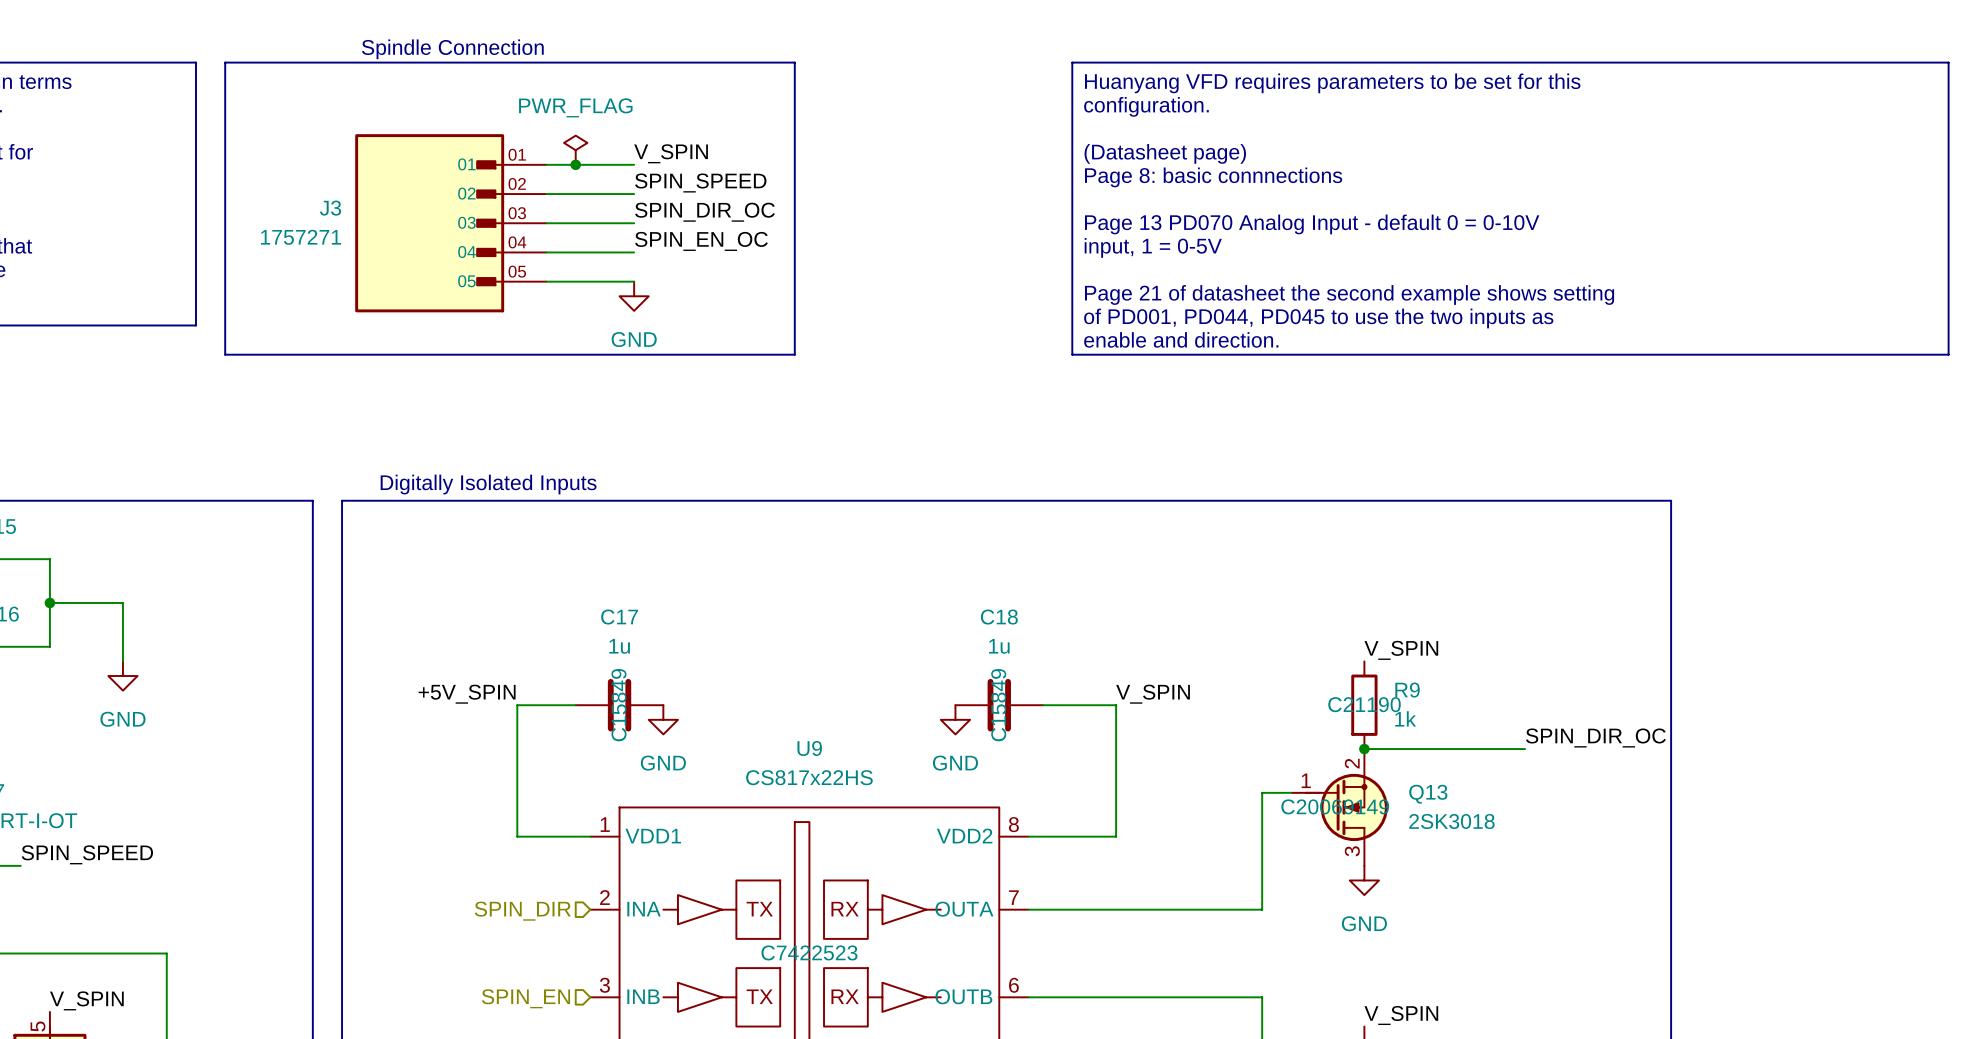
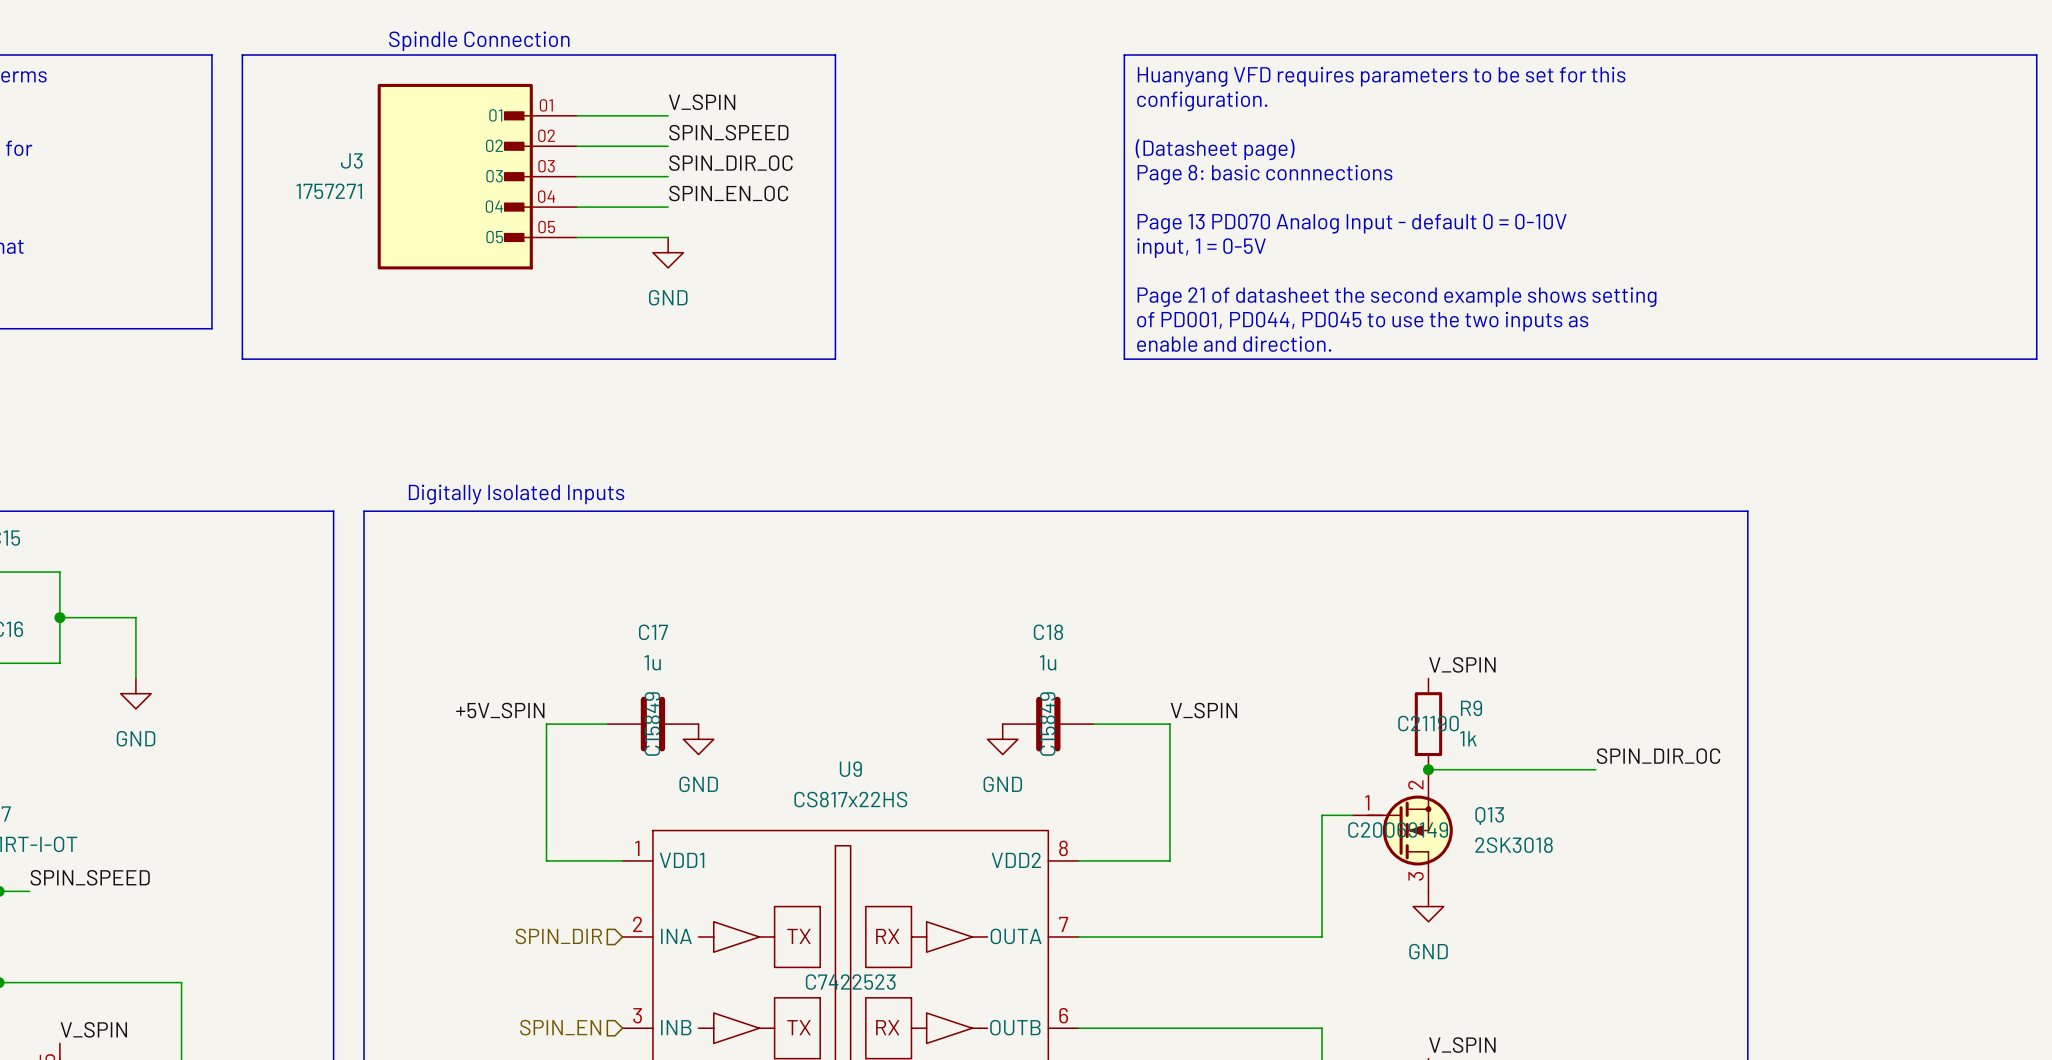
power symbol: PWR_FLAG (575, 150) -> none
label position: V_SPIN (671, 153) -> V_SPIN (702, 102)
wire: (546, 164) (634, 164) -> (576, 115) (668, 115)
junction: (575, 164) -> none
label position: SPIN_SPEED (700, 183) -> SPIN_SPEED (728, 132)
wire: (546, 194) (634, 194) -> (576, 146) (668, 146)
label position: SPIN_DIR_OC (705, 212) -> SPIN_DIR_OC (730, 163)
J3 position: (450, 223) -> (477, 176)
wire: (546, 223) (634, 223) -> (576, 176) (668, 176)
label position: SPIN_EN_OC (701, 241) -> SPIN_EN_OC (728, 193)
wire: (546, 252) (634, 252) -> (576, 207) (668, 207)
wire: (546, 281) (634, 281) -> (576, 237) (668, 237)
power symbol position: GND (634, 296) -> GND (668, 252)

